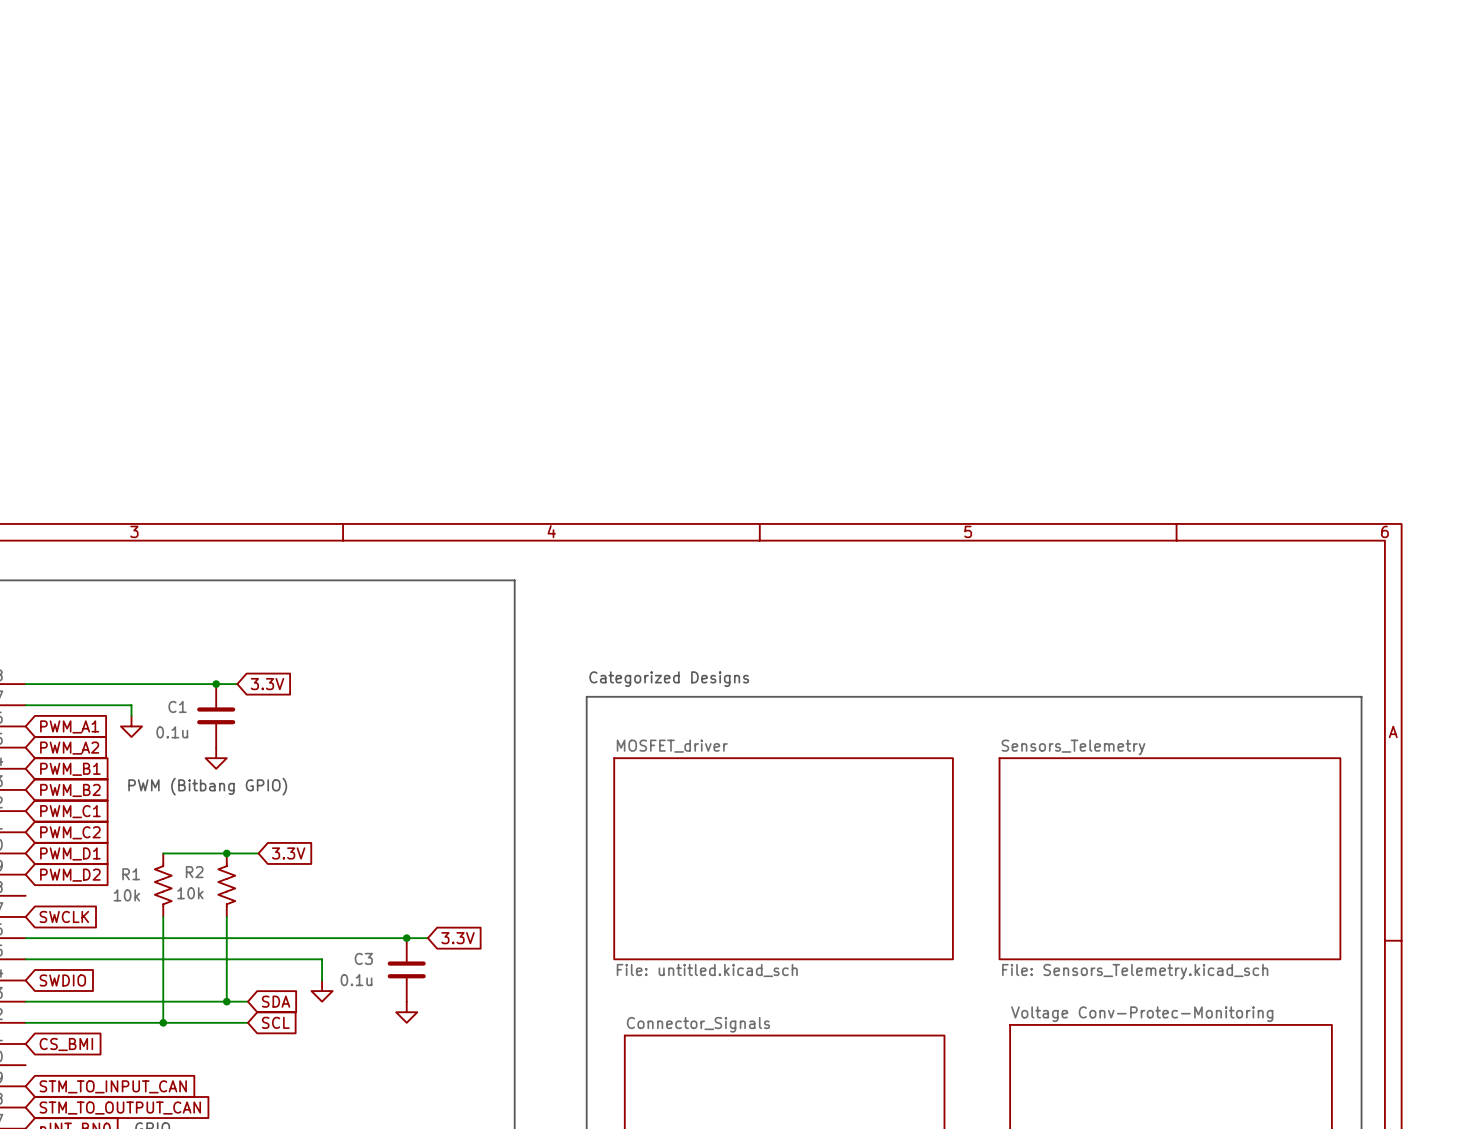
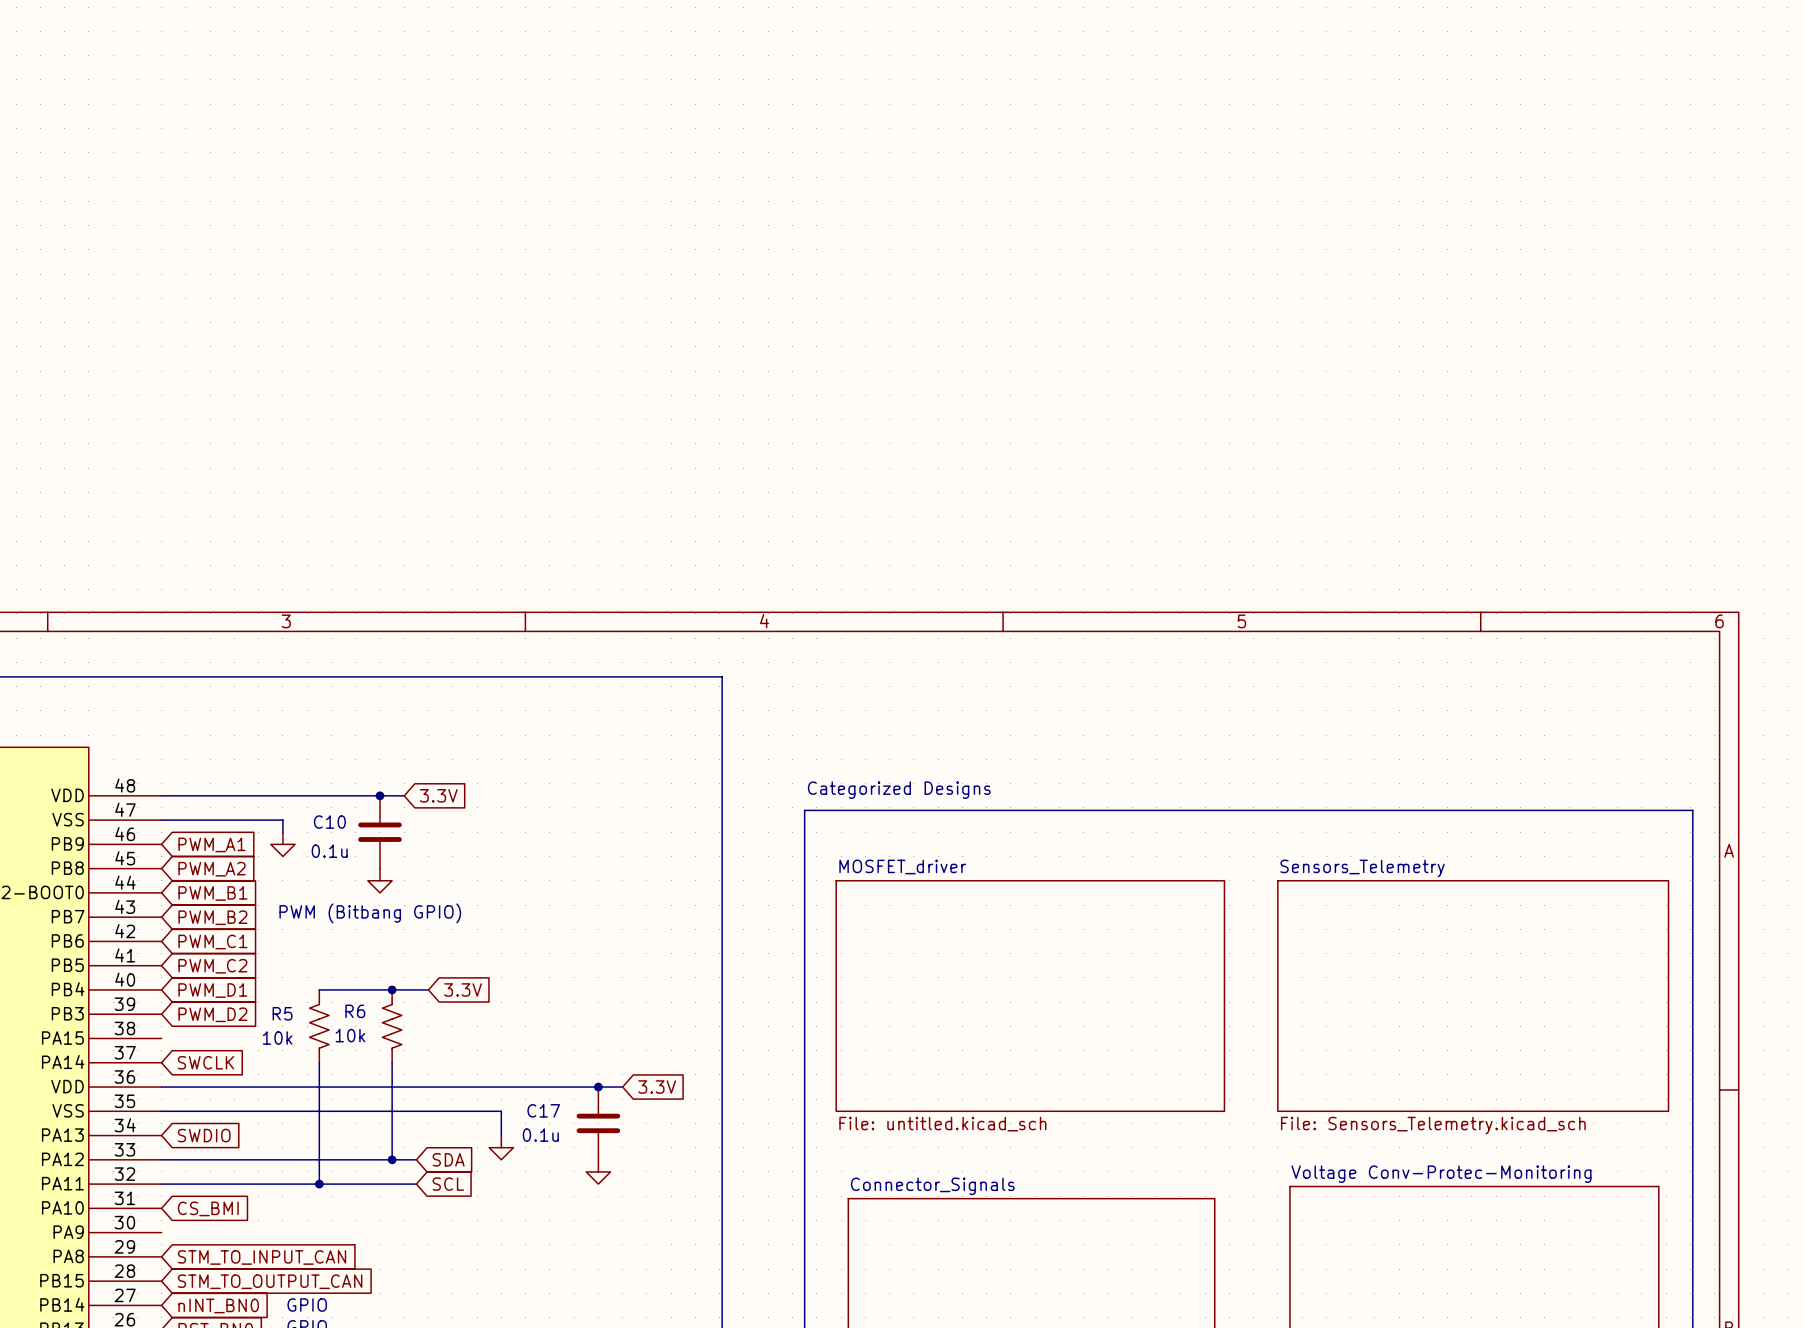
C1 name: C1 (177, 706) -> C10 (329, 822)
R2 name: R2 (194, 872) -> R6 (355, 1011)
R1 name: R1 (131, 874) -> R5 (282, 1013)
C3 name: C3 (363, 958) -> C17 (543, 1110)

